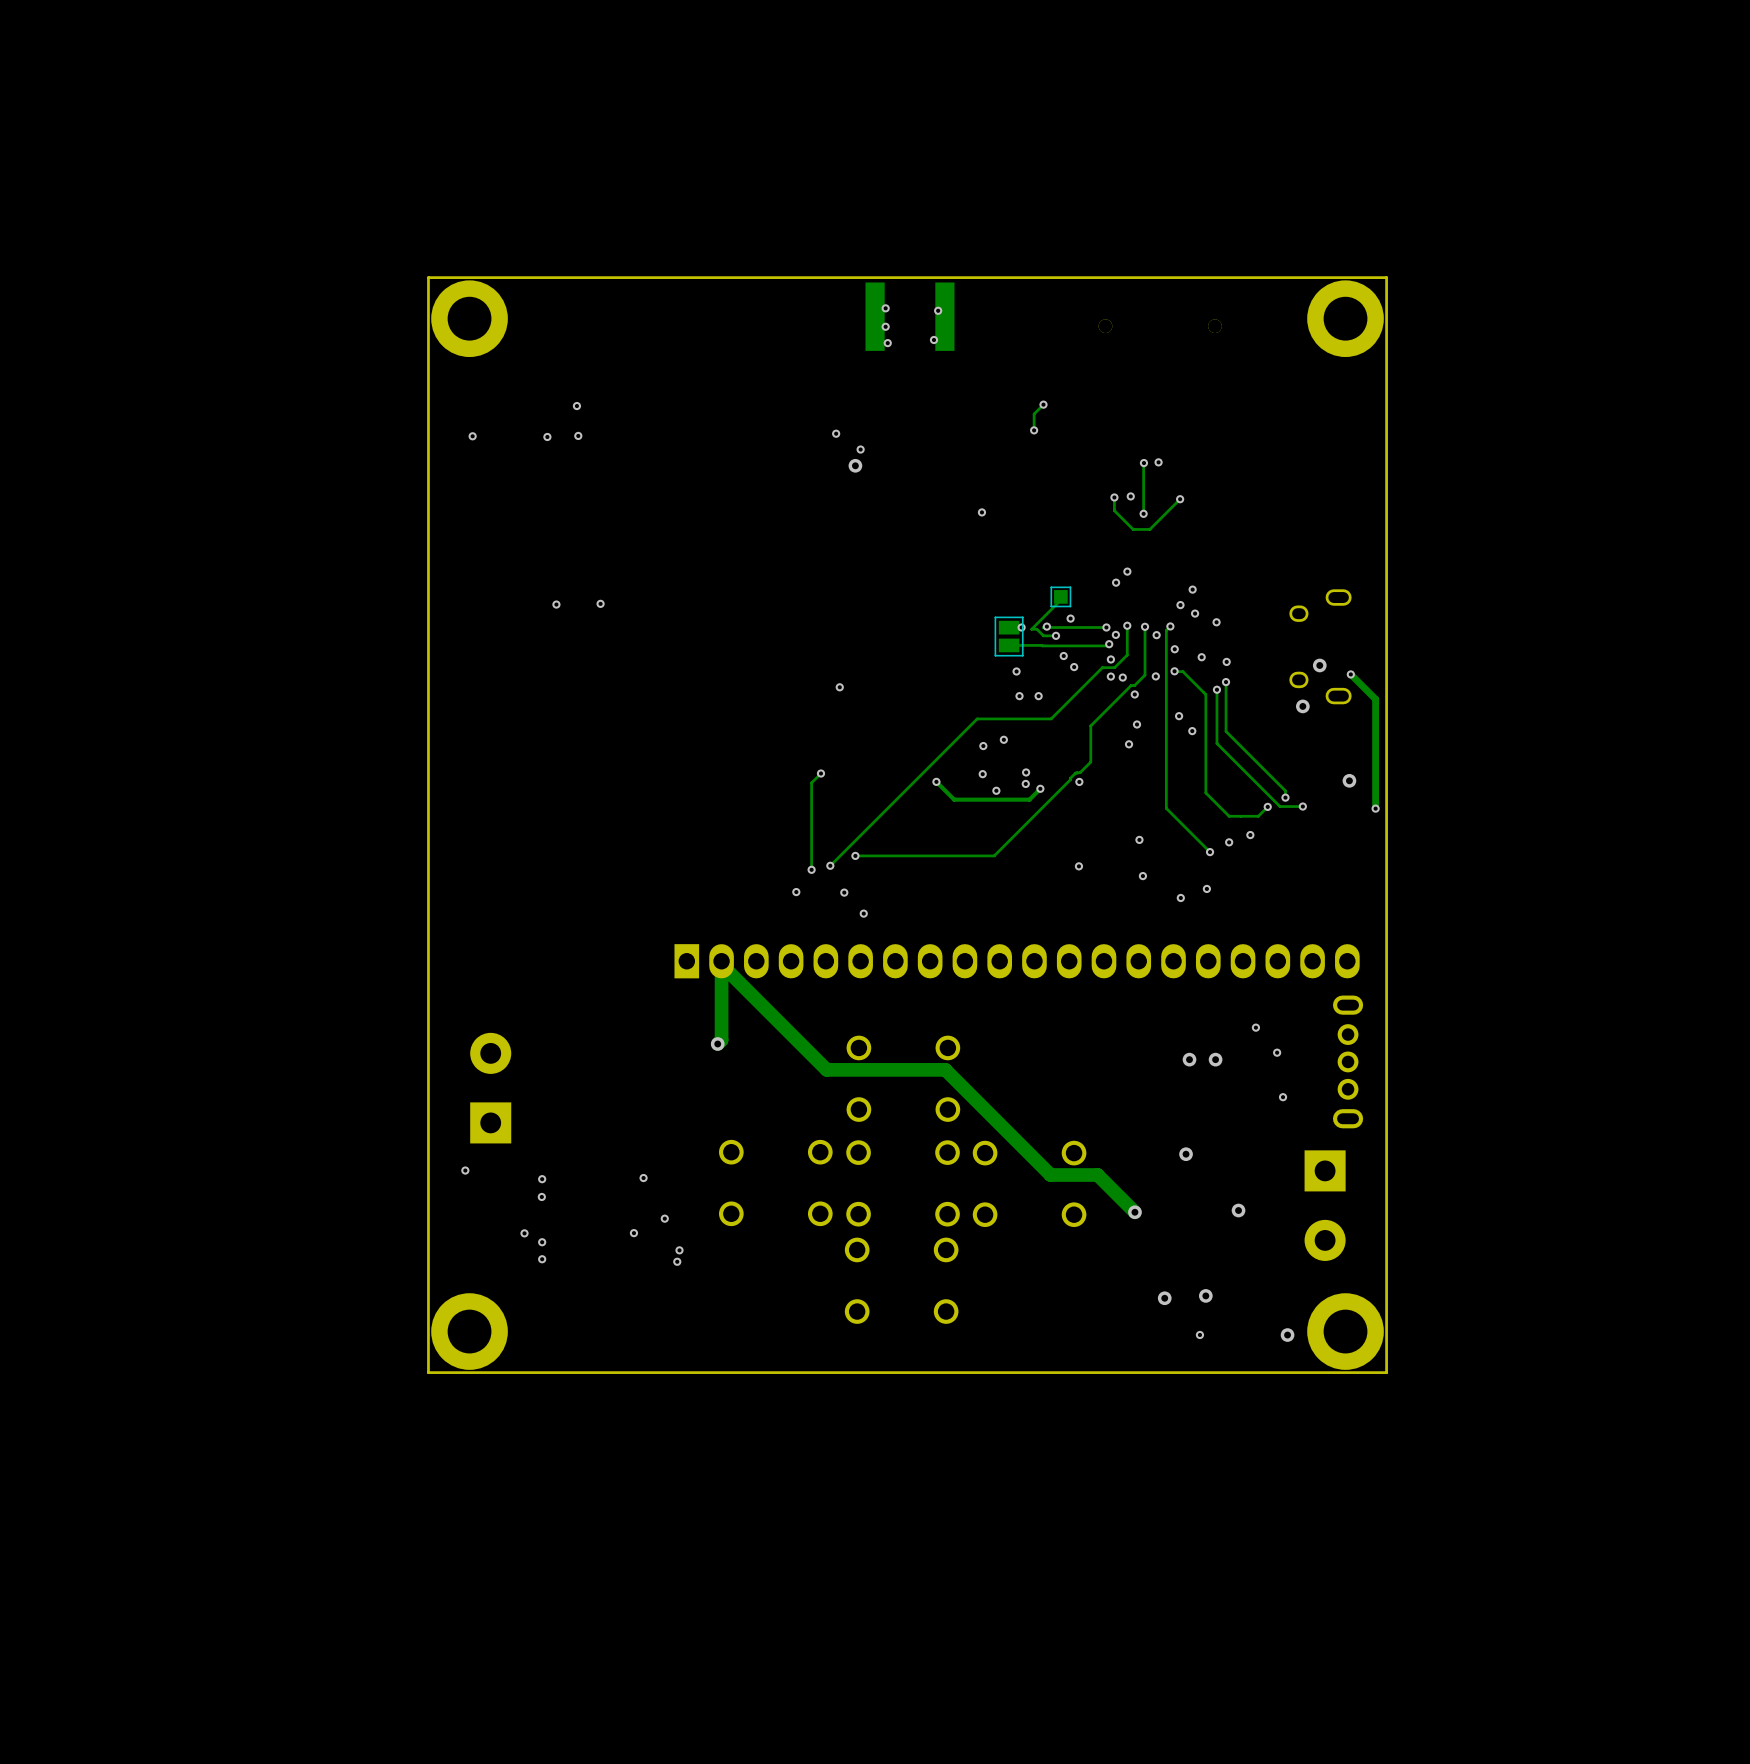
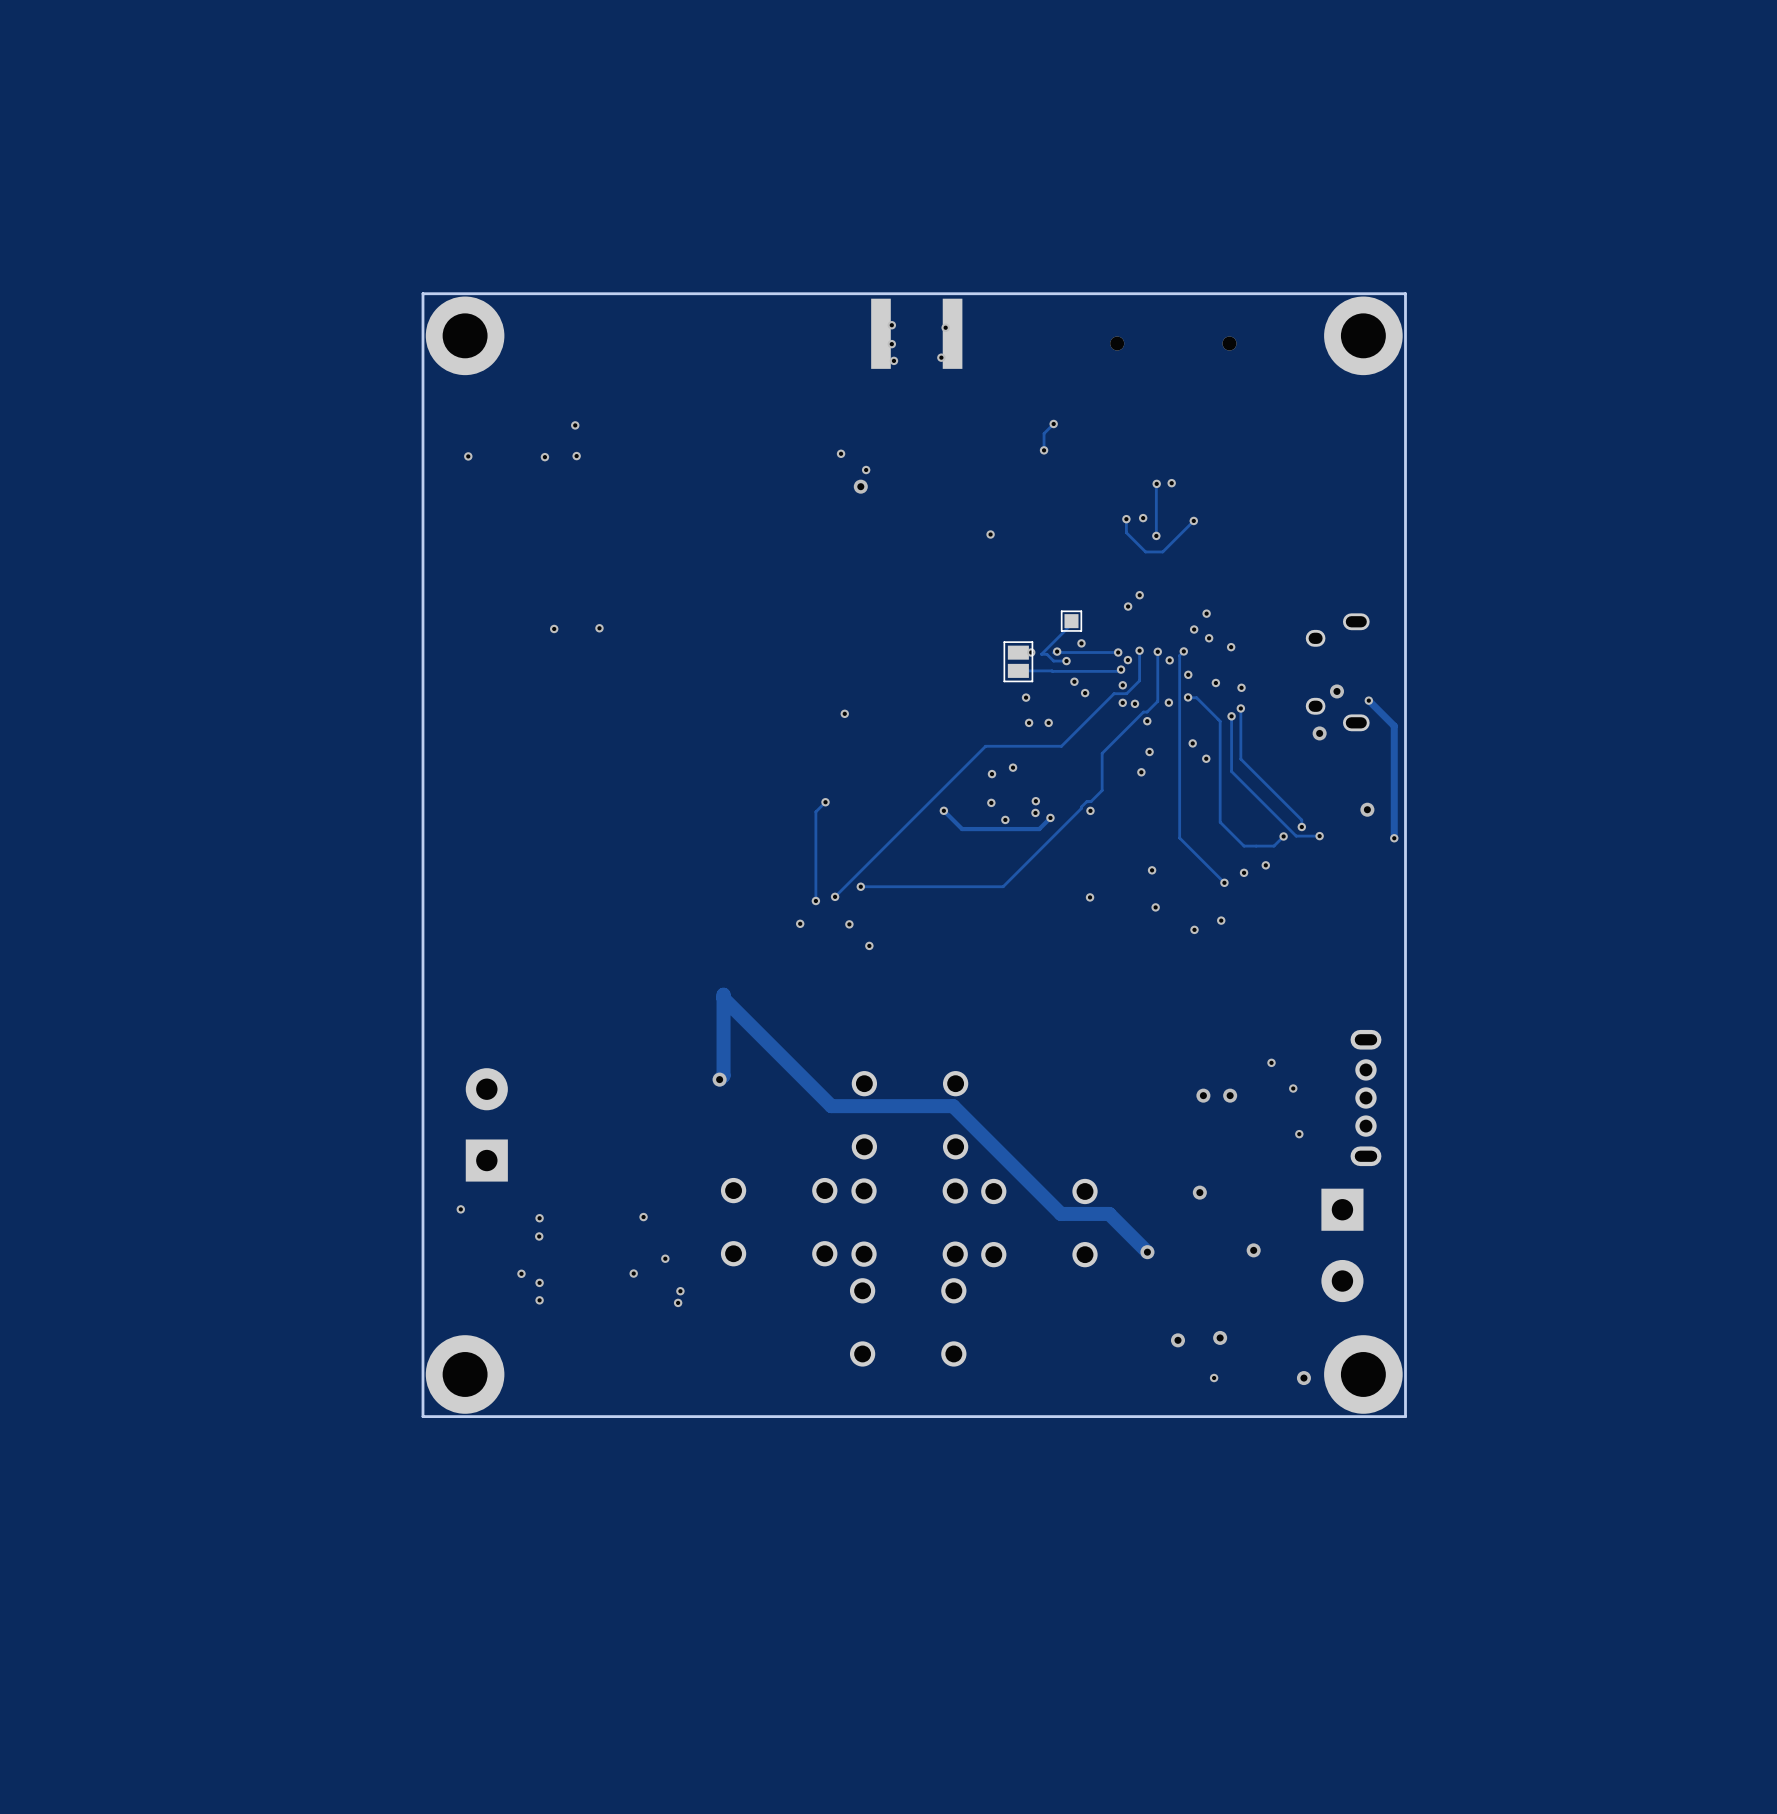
part: (1017, 961) -> none

